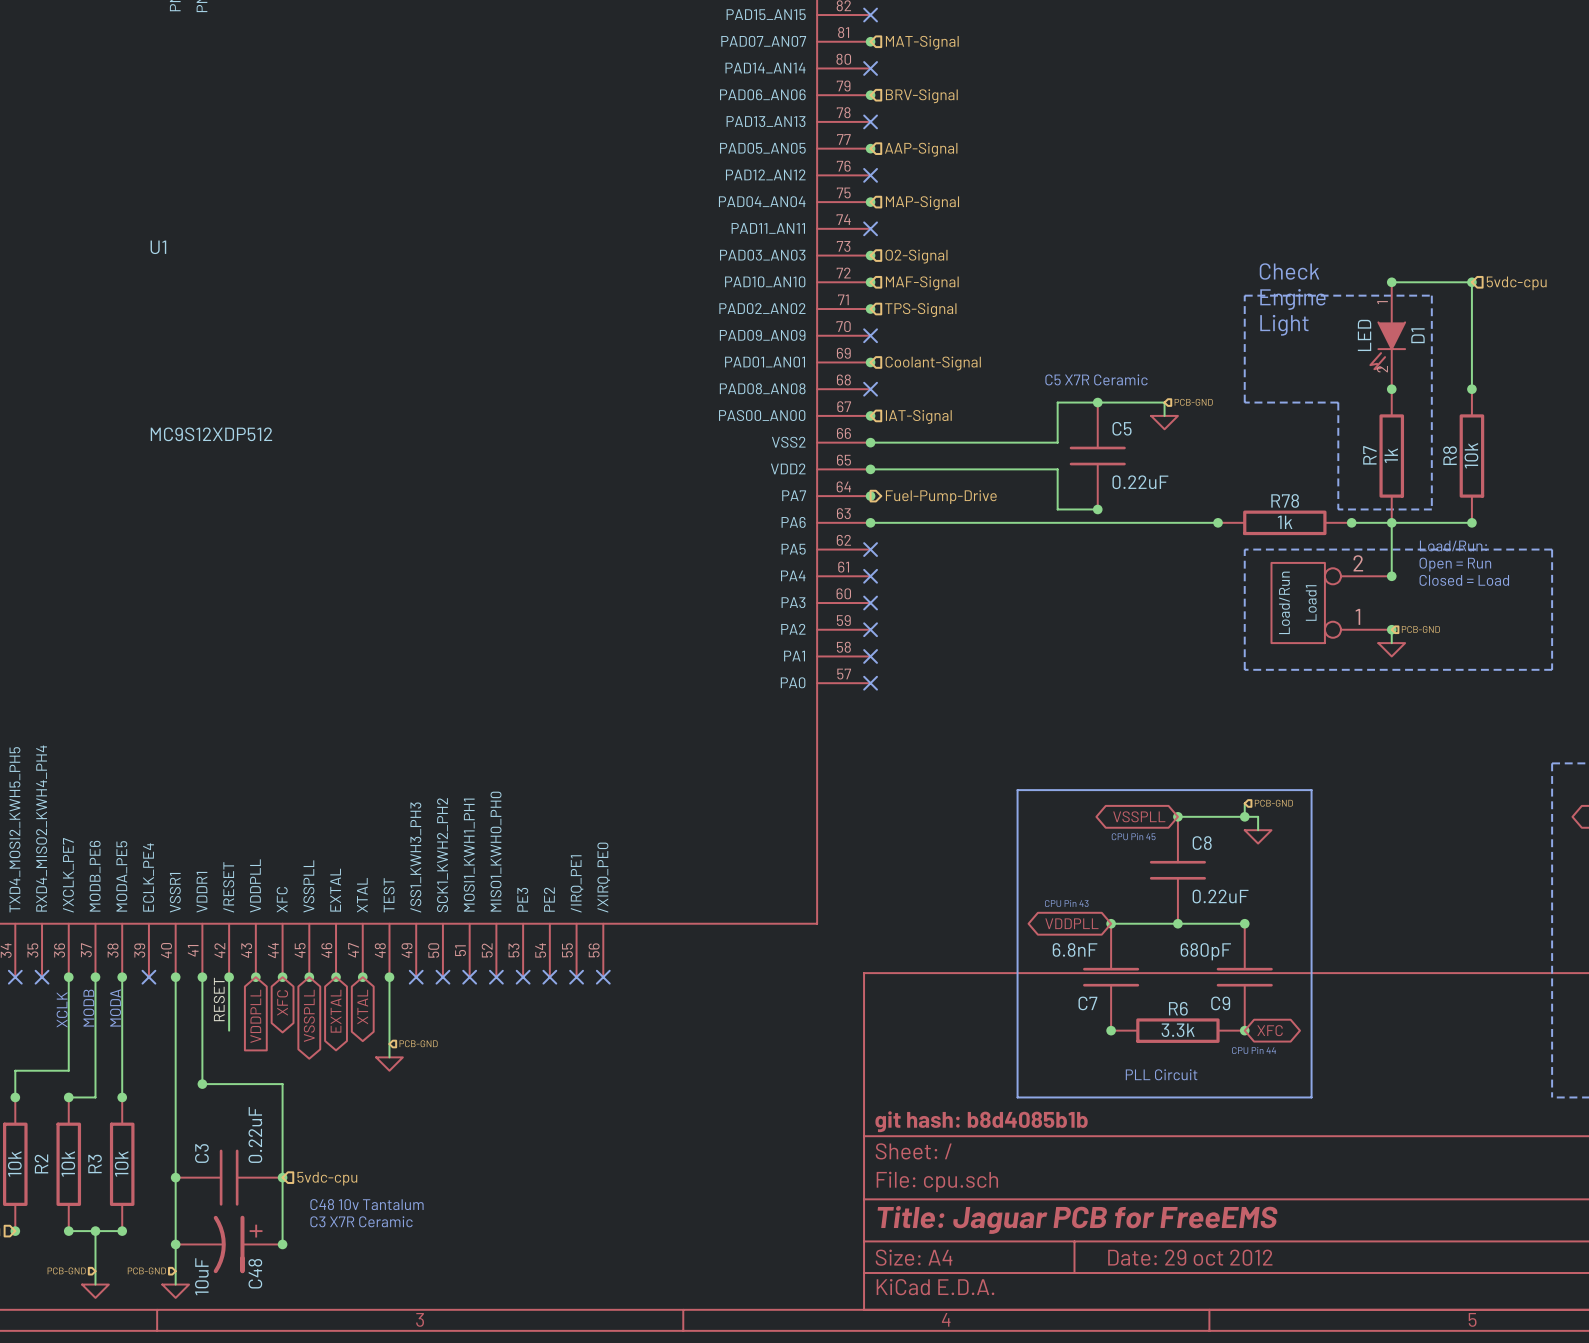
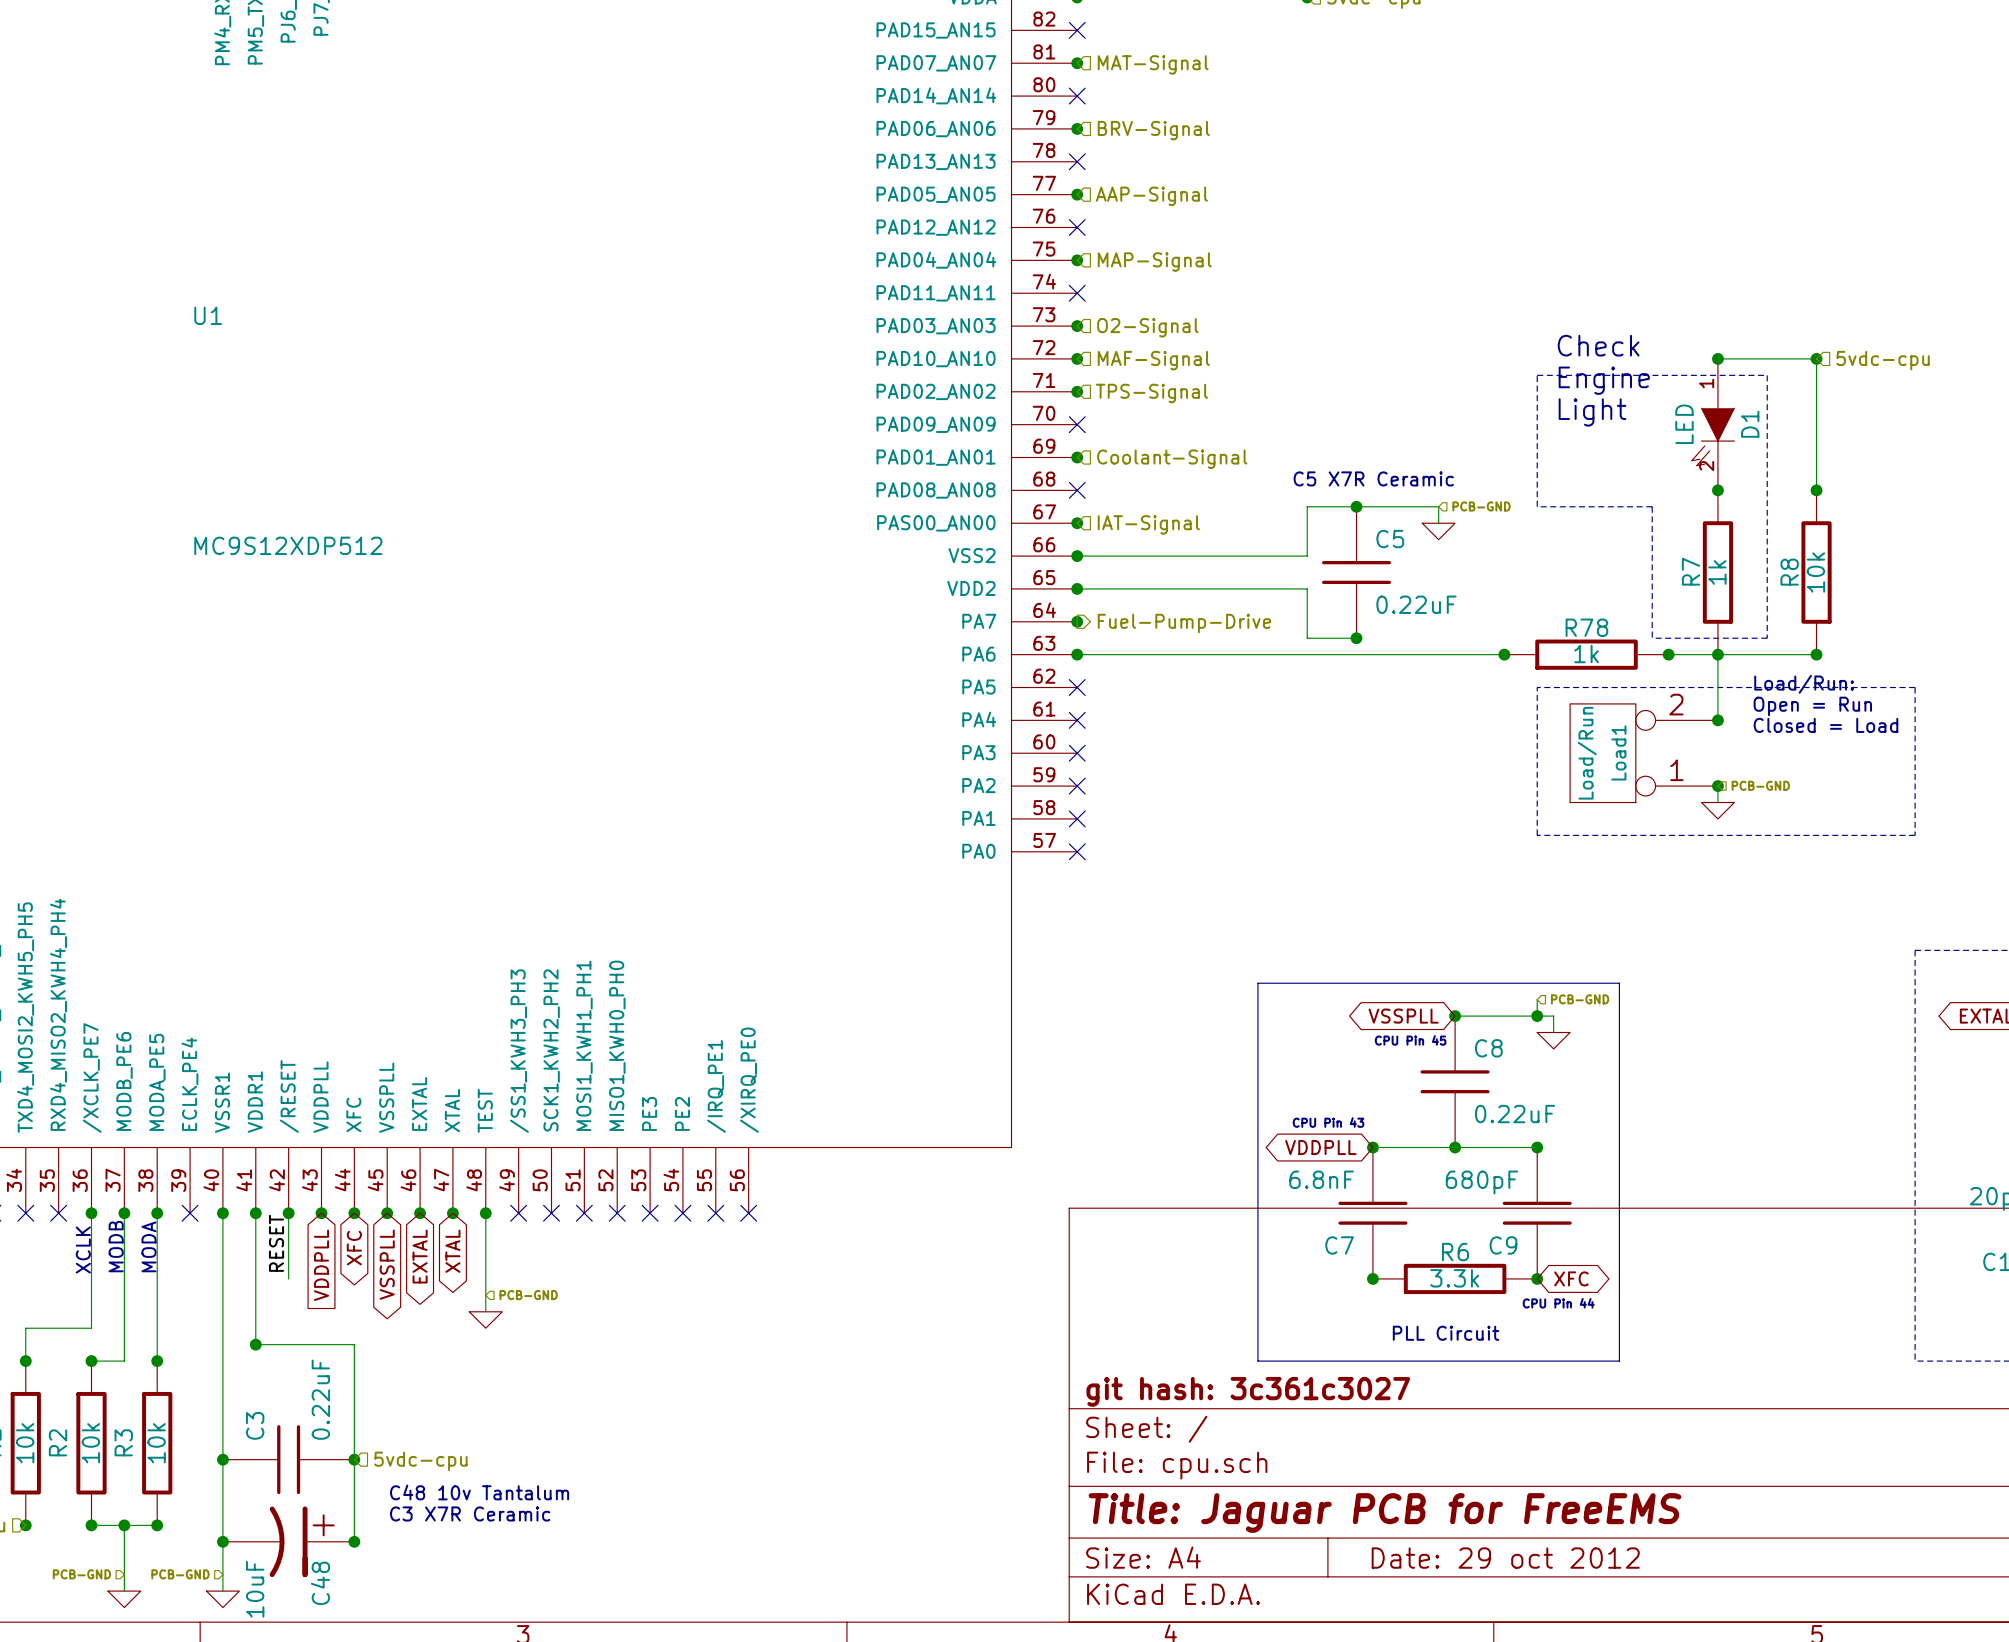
title block: git hash: b8d4085b1b (981, 1121) -> git hash: 3c361c3027 (1248, 1391)

